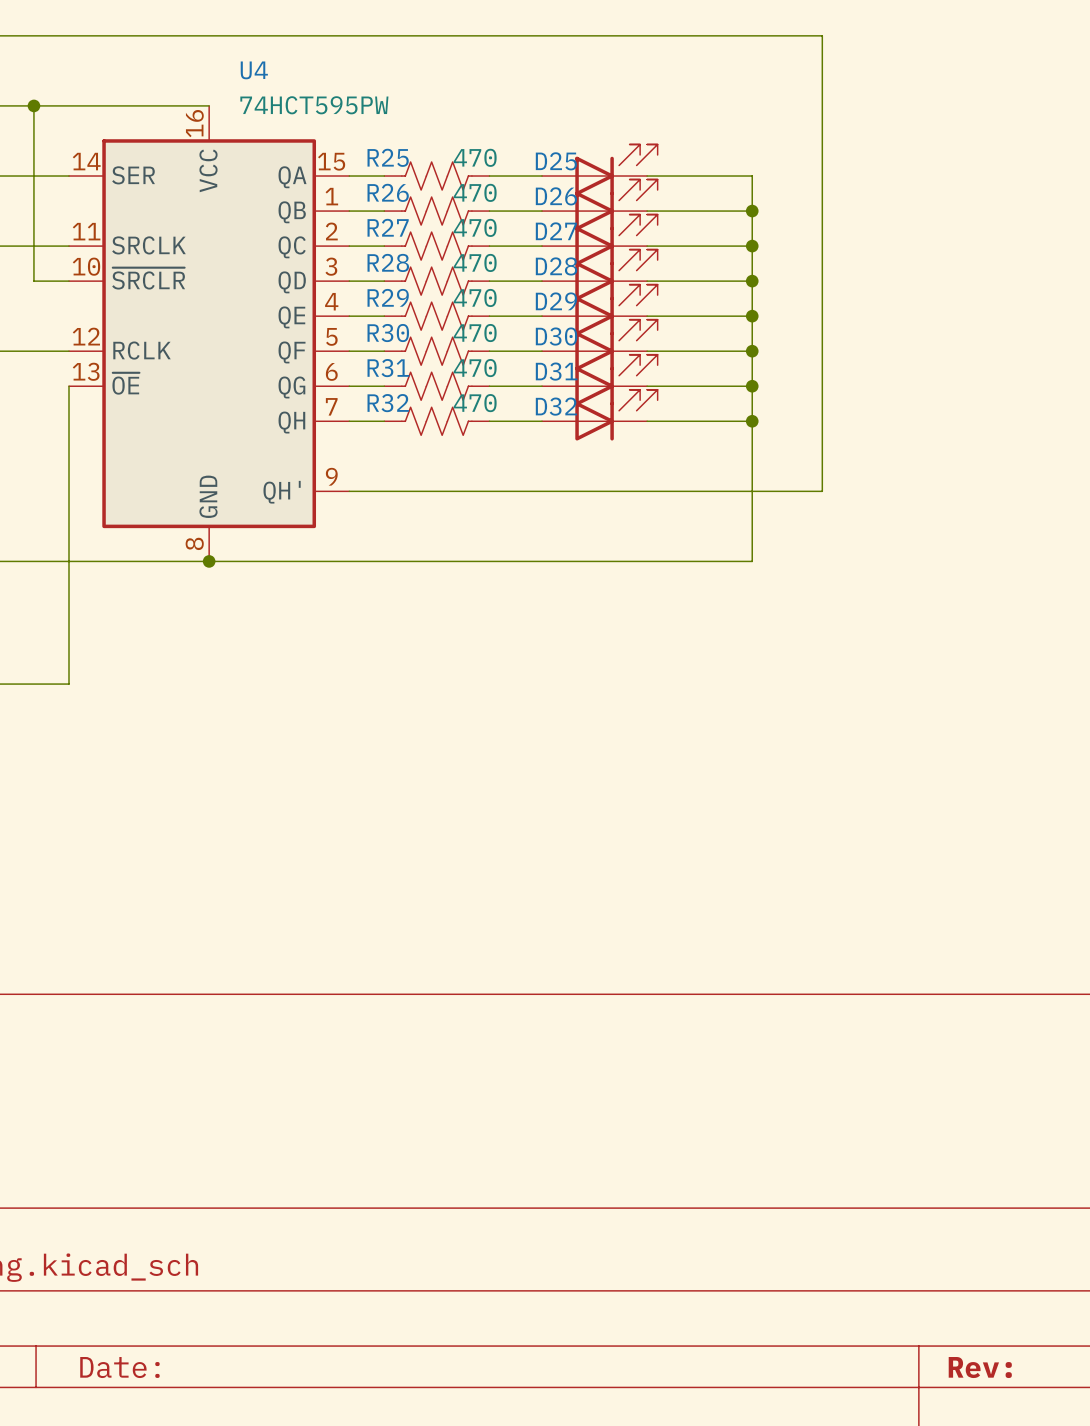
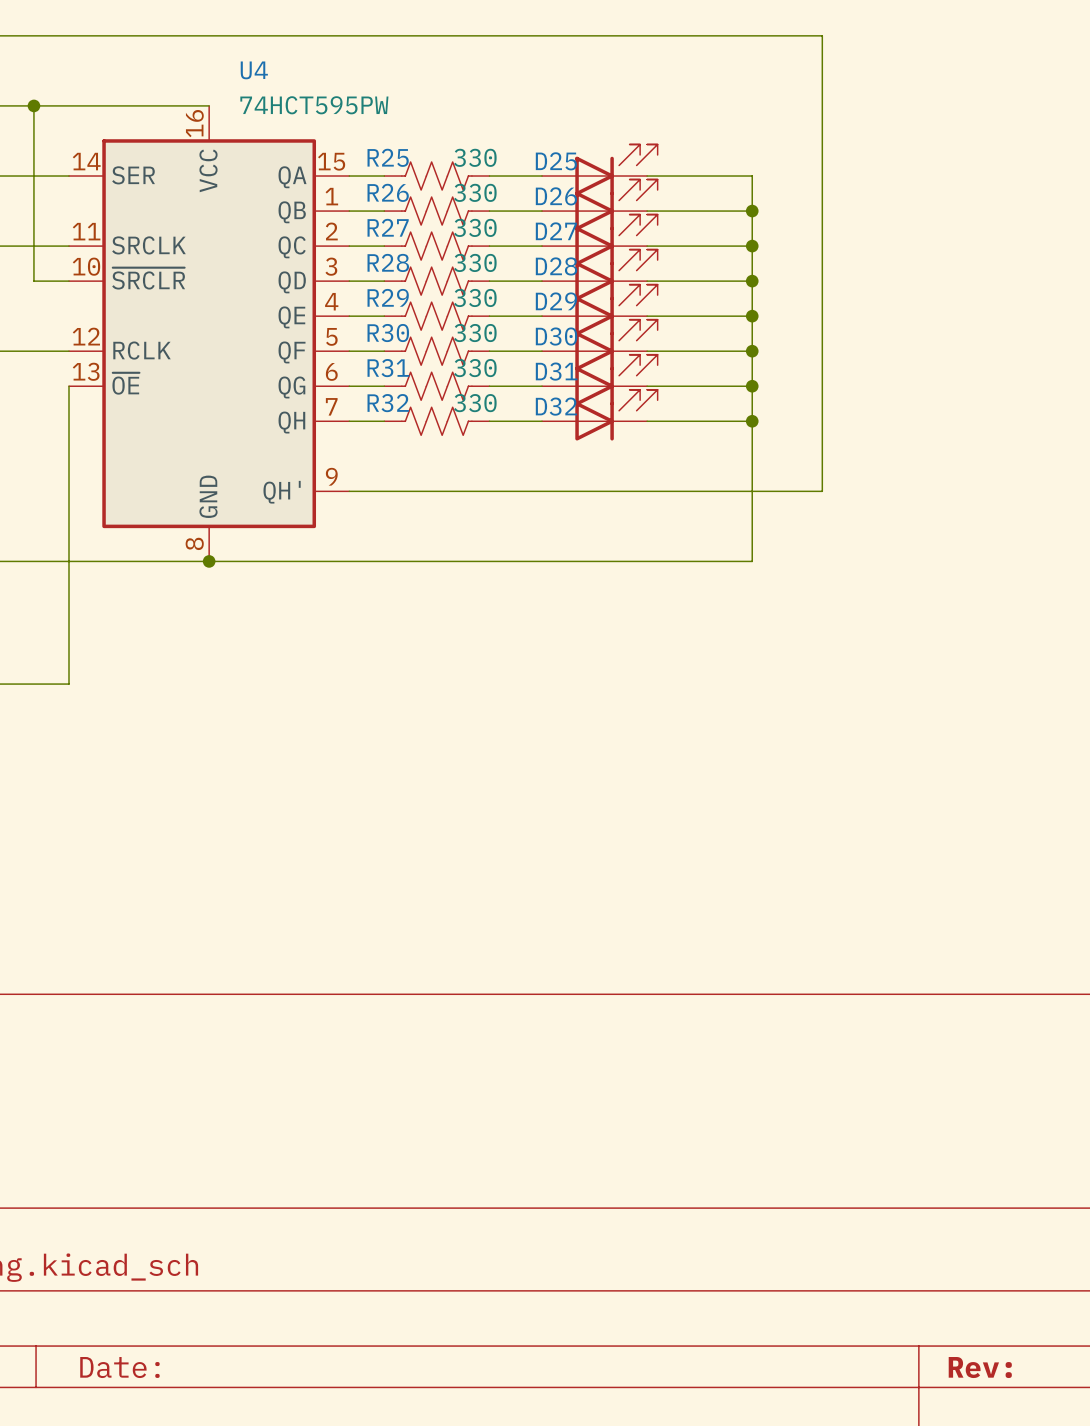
R25 value: 470 (475, 157) -> 330 (475, 157)
R26 value: 470 (475, 192) -> 330 (475, 192)
R27 value: 470 (475, 227) -> 330 (475, 227)
R28 value: 470 (475, 262) -> 330 (475, 262)
R29 value: 470 (475, 297) -> 330 (475, 297)
R30 value: 470 (475, 333) -> 330 (475, 333)
R31 value: 470 (475, 368) -> 330 (475, 368)
R32 value: 470 (475, 403) -> 330 (475, 403)

